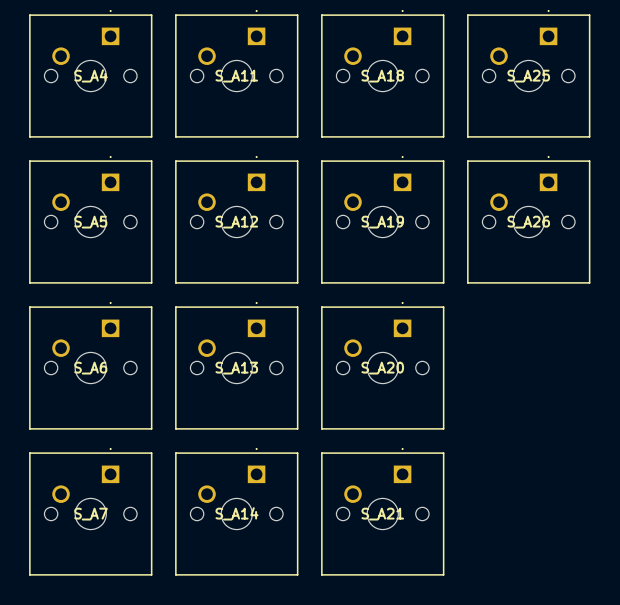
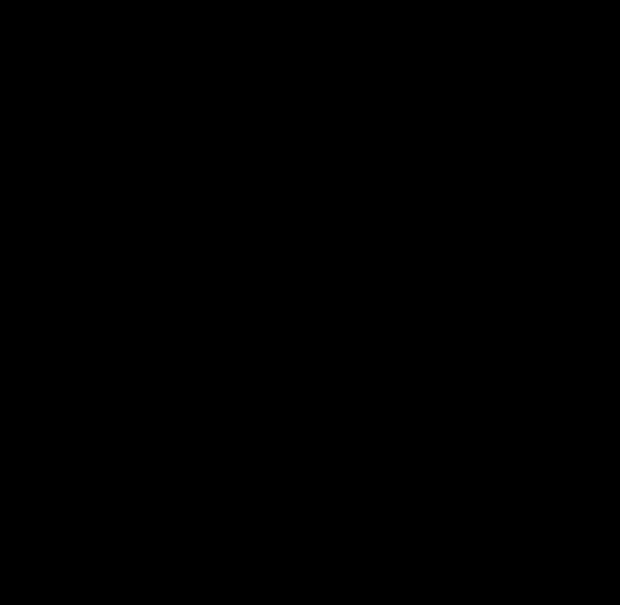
S_A4: (90, 73) -> none
S_A11: (236, 73) -> none
S_A18: (382, 73) -> none
S_A25: (528, 73) -> none
S_A5: (90, 219) -> none
S_A12: (236, 219) -> none
S_A19: (382, 219) -> none
S_A26: (528, 219) -> none
S_A6: (90, 365) -> none
S_A13: (236, 365) -> none
S_A20: (382, 365) -> none
S_A7: (90, 511) -> none
S_A14: (236, 511) -> none
S_A21: (382, 511) -> none

